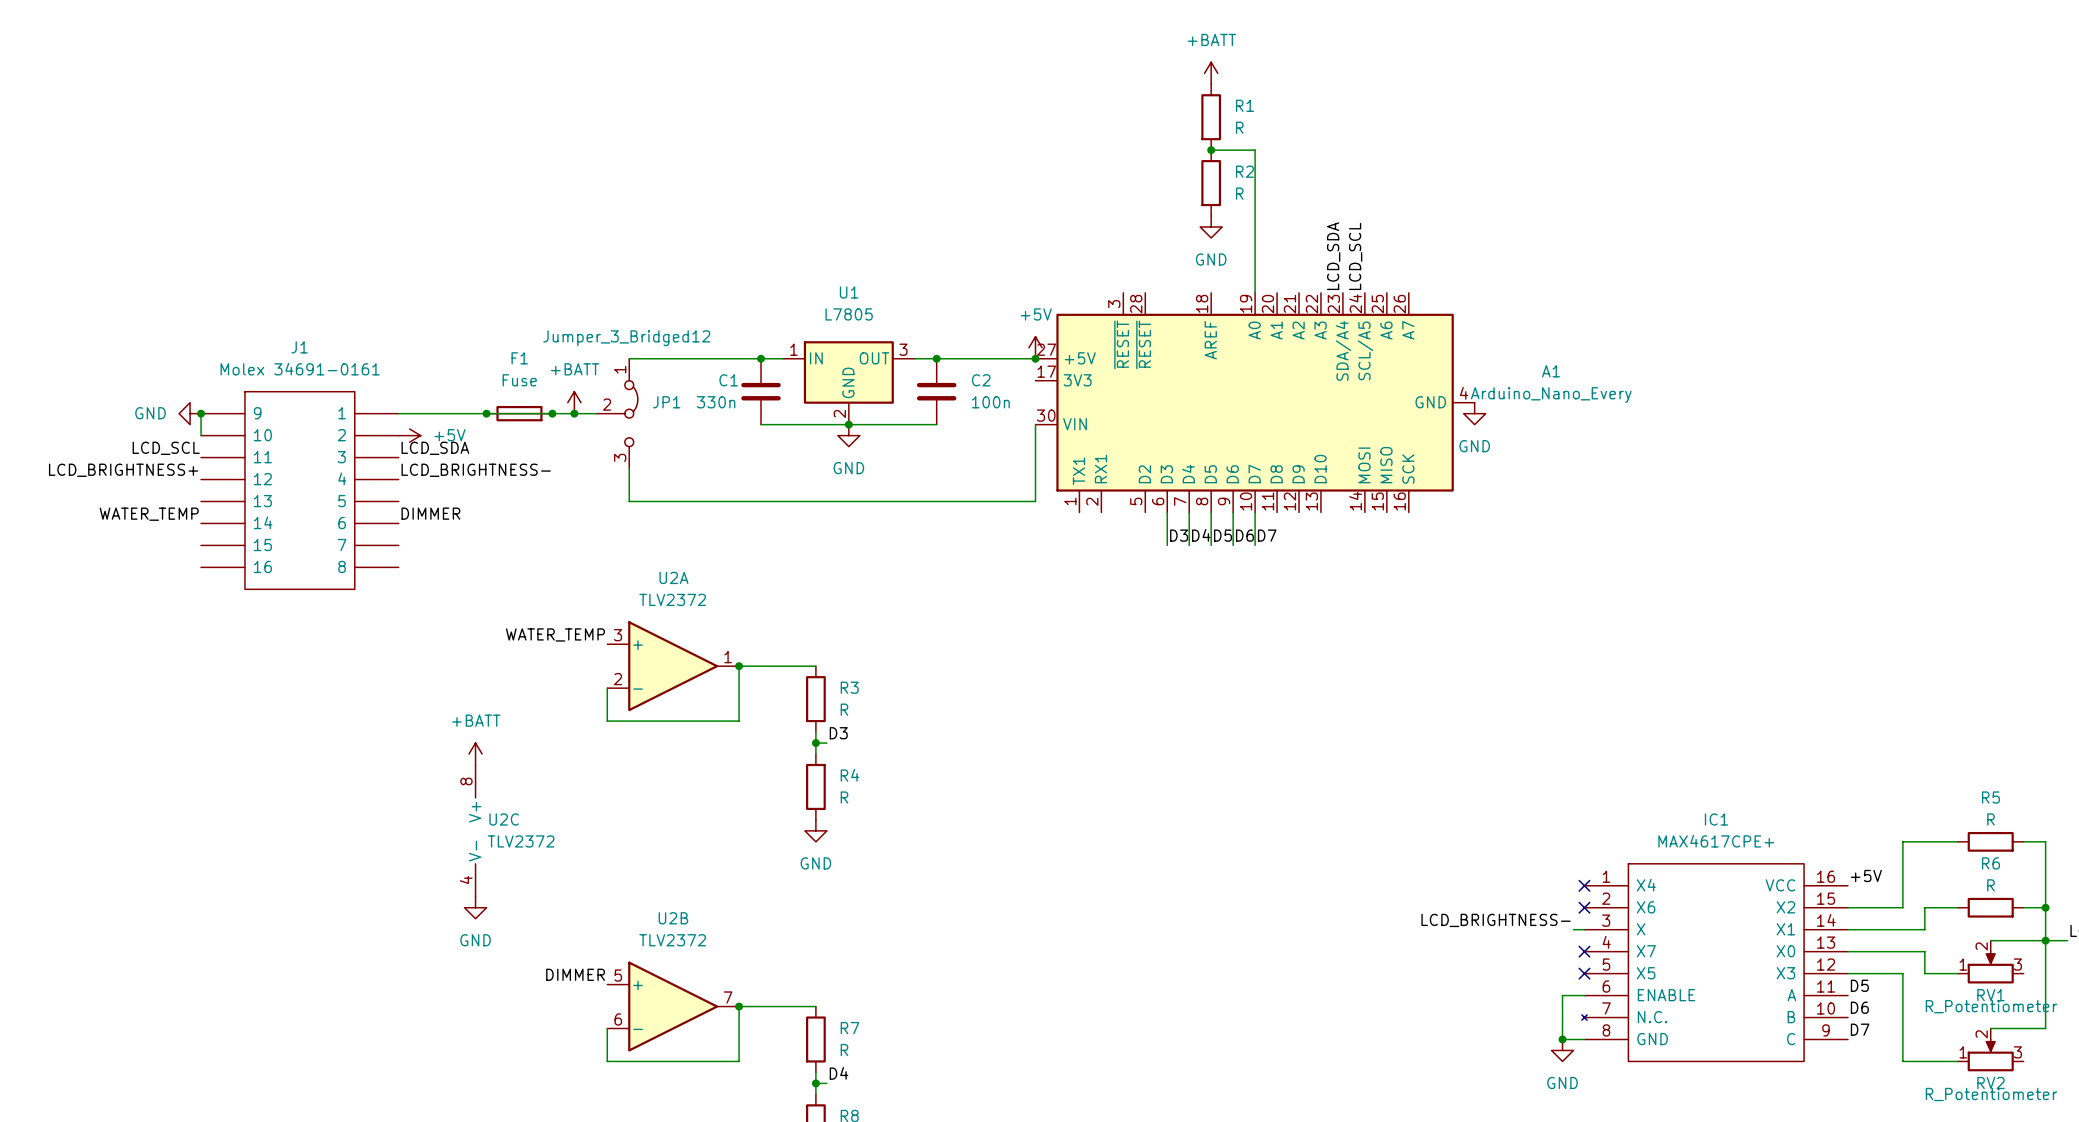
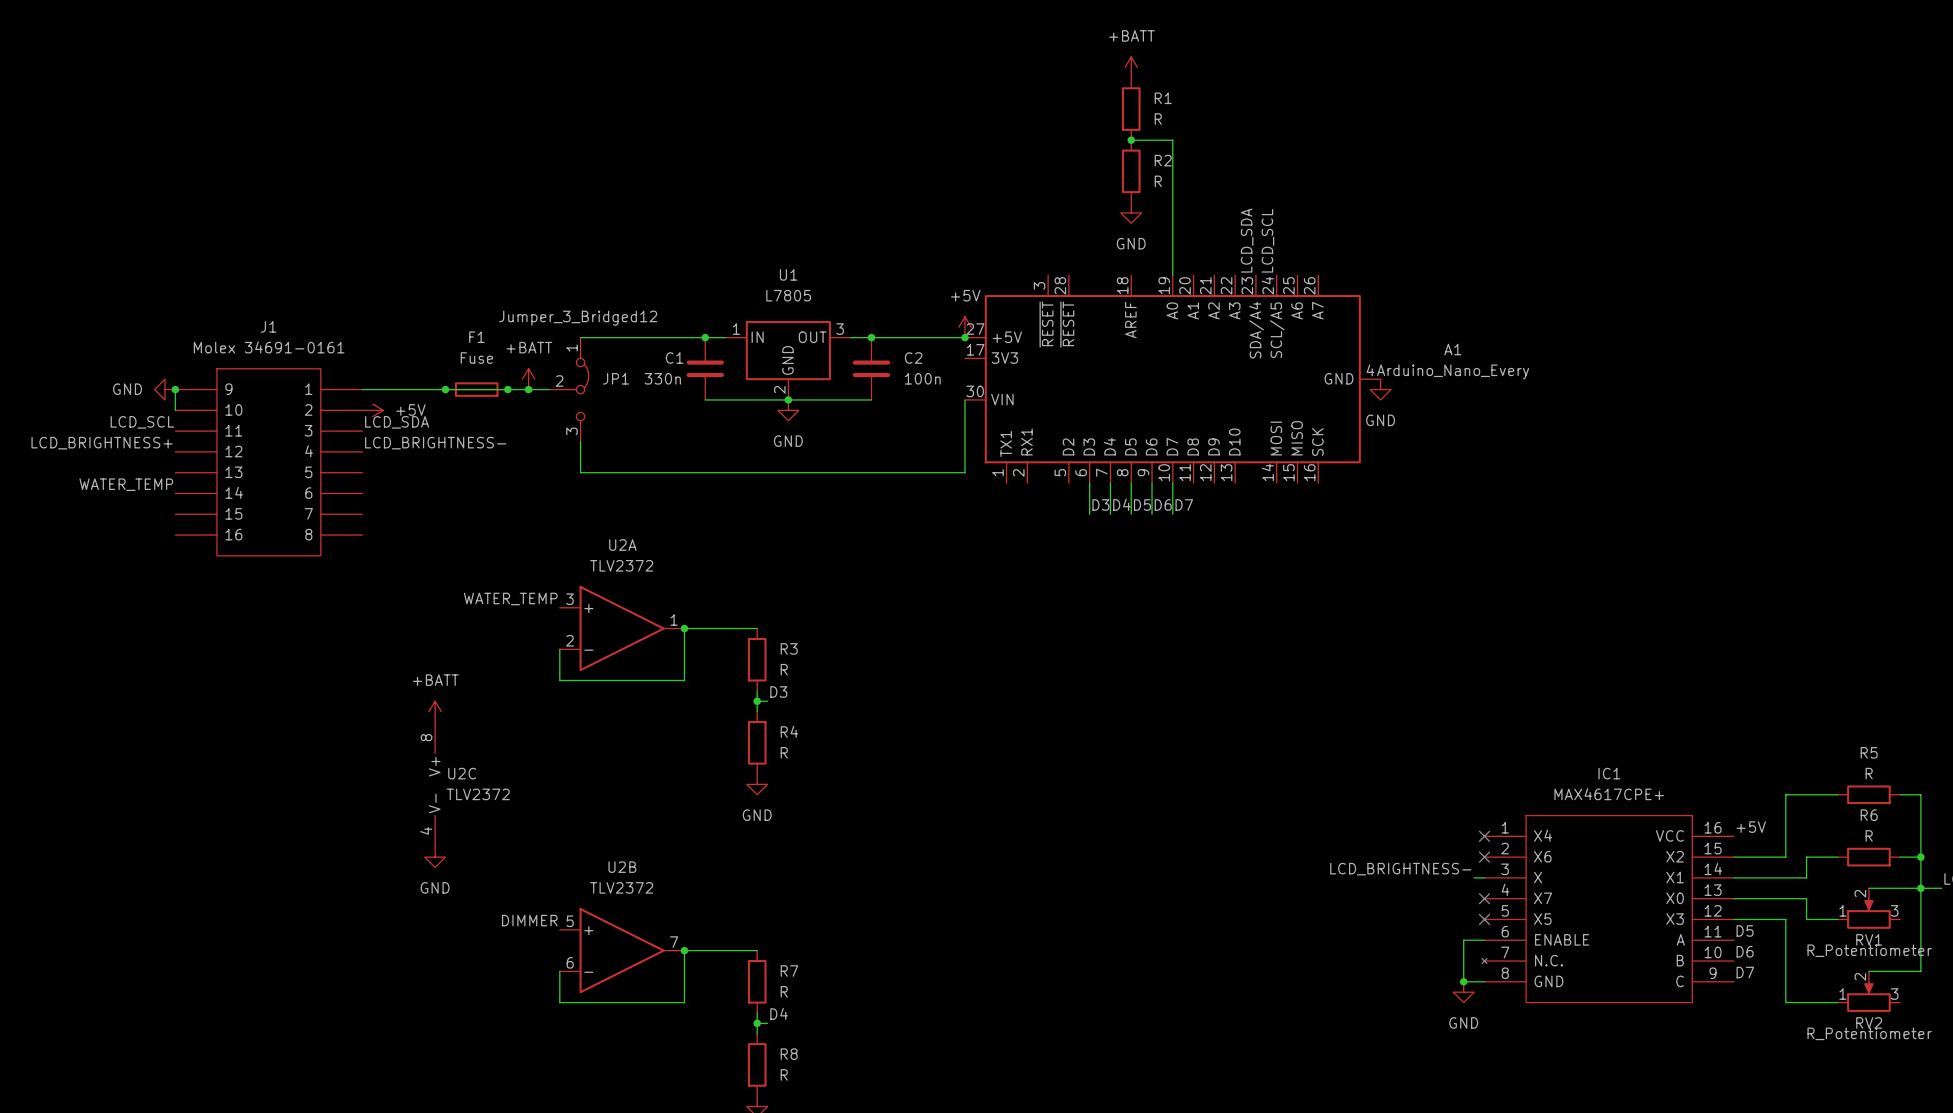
label: DIMMER (430, 513) -> none

